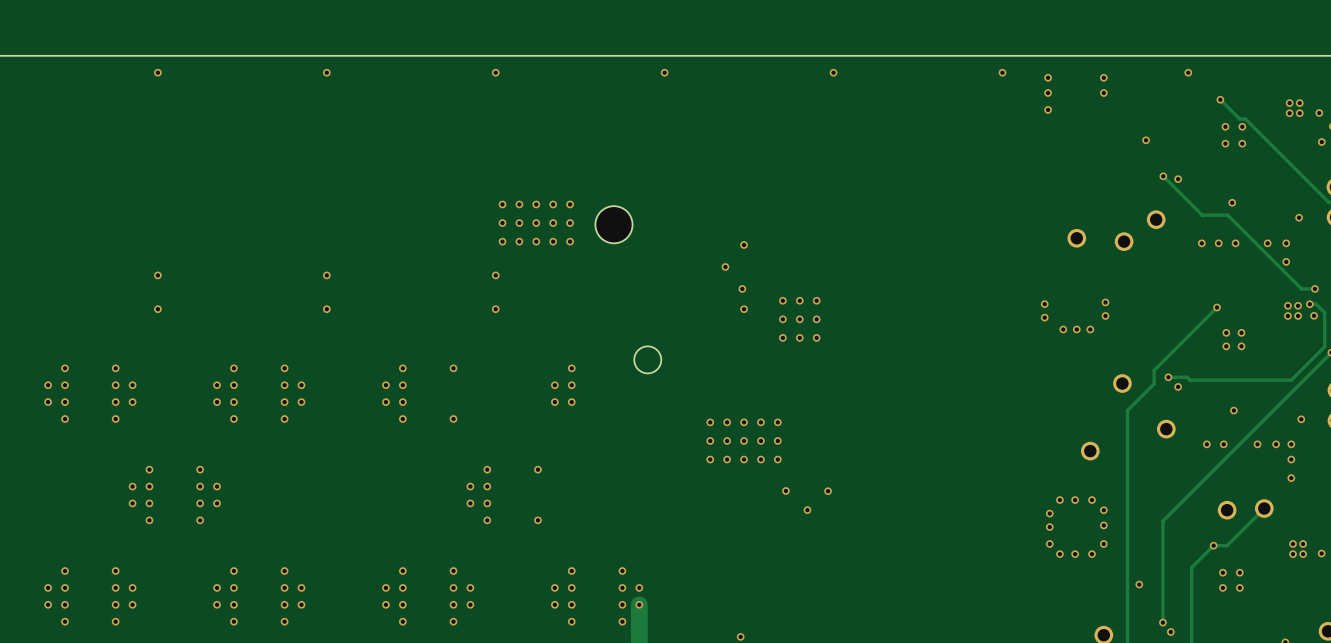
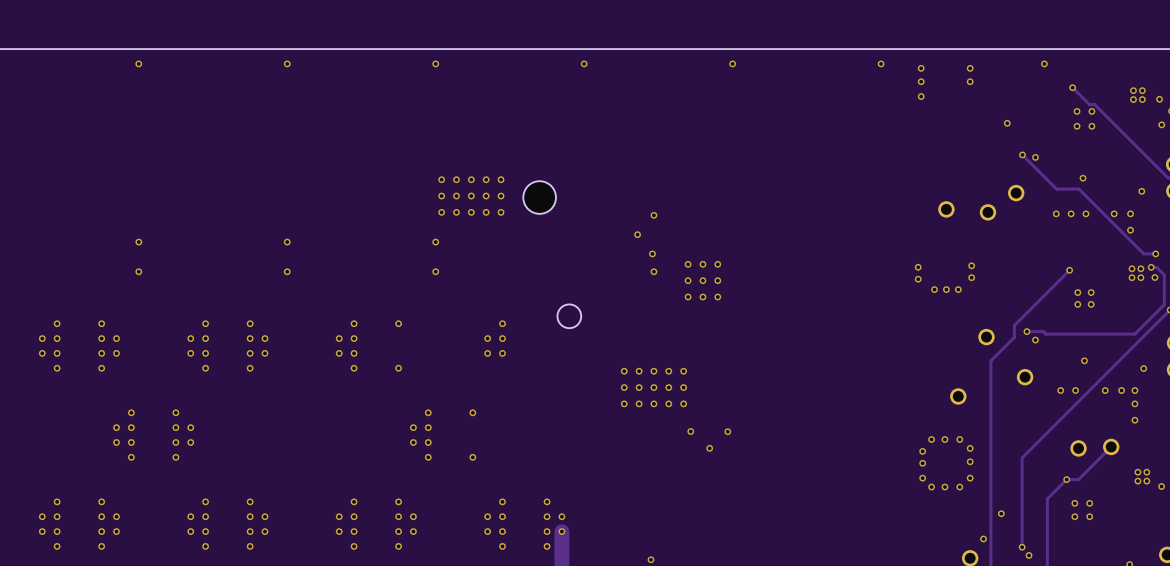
via: none -> (1137, 472)
via: none -> (1146, 472)
via: (1293, 543) -> none
via: (1303, 543) -> none
via: none -> (1137, 481)
via: none -> (1146, 481)
via: (1293, 554) -> none
via: (1303, 554) -> none
via: none -> (983, 538)

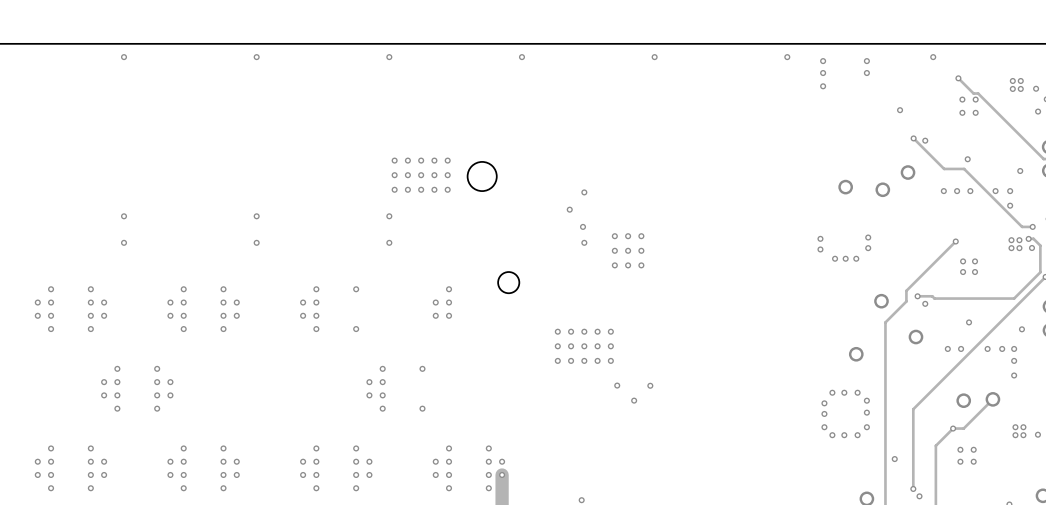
via: (1137, 472) -> none
via: (1146, 472) -> none
via: none -> (1015, 427)
via: none -> (1023, 427)
via: (1137, 481) -> none
via: (1146, 481) -> none
via: none -> (1015, 435)
via: none -> (1023, 435)
via: (983, 538) -> none

